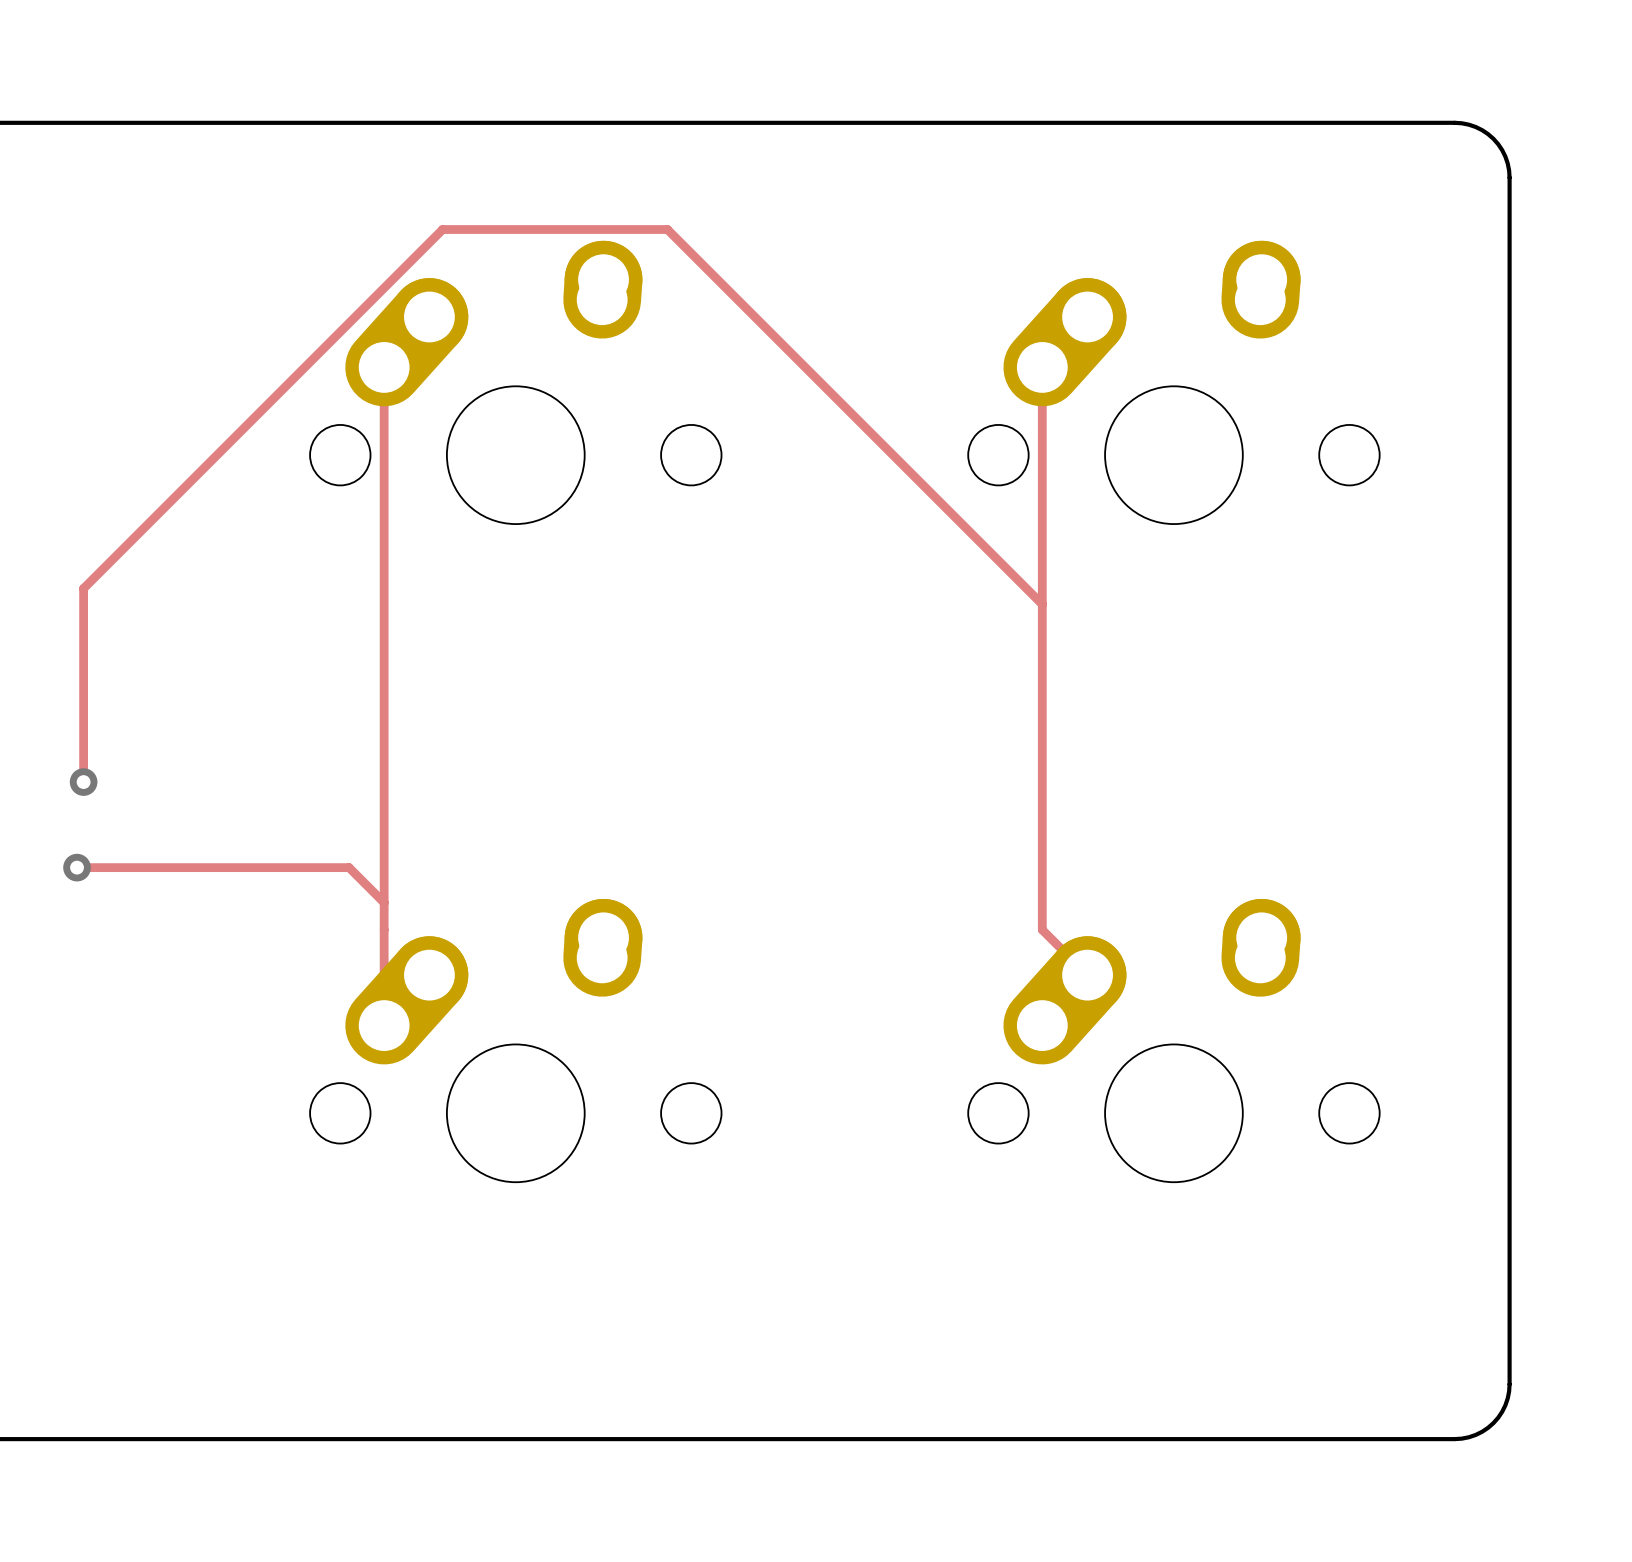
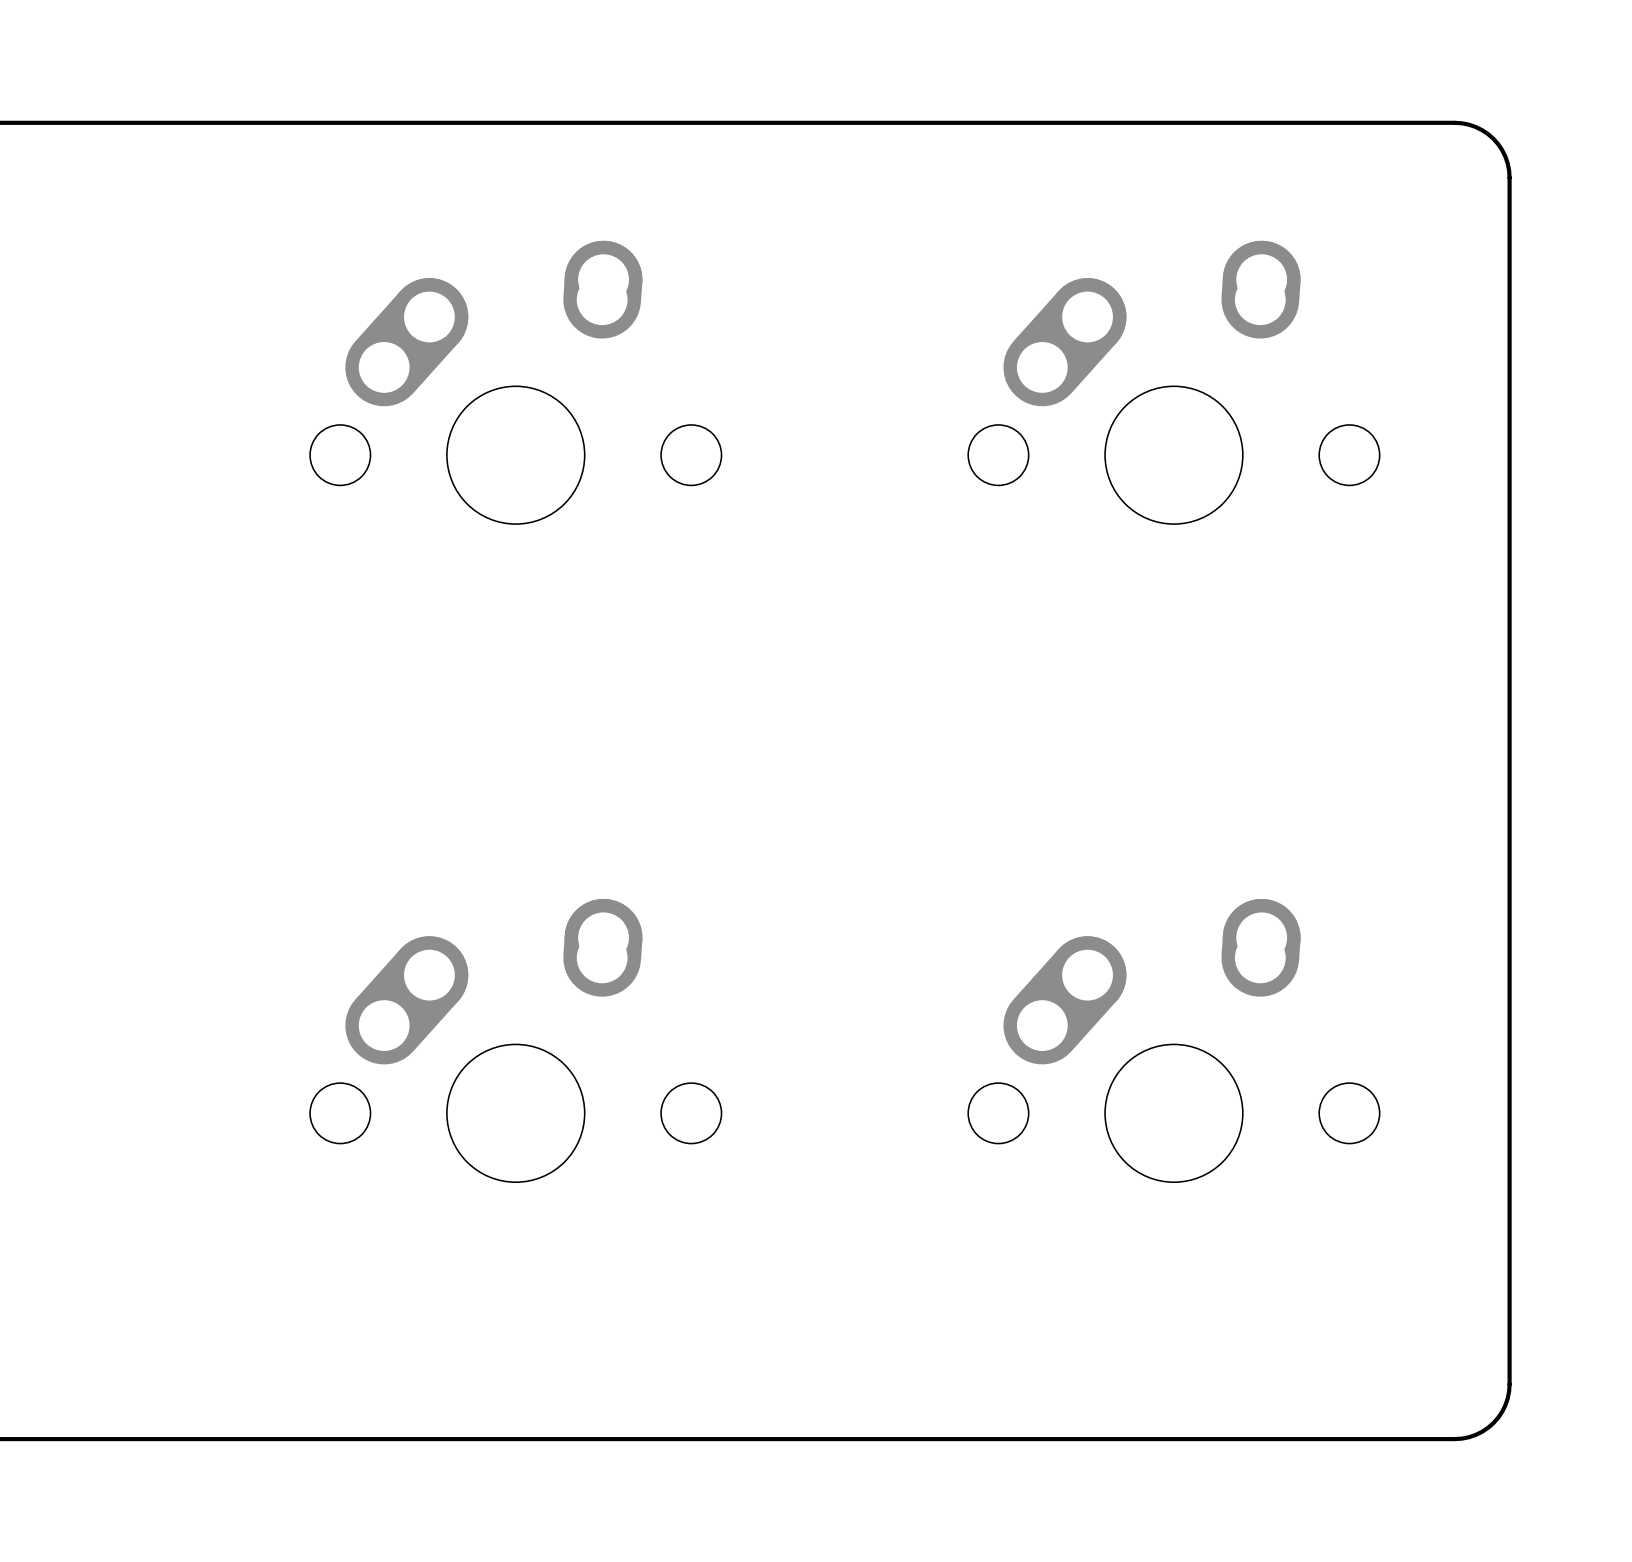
track: (384, 367) (384, 1025) -> none
track: (1042, 367) (1042, 929) (1087, 975) -> none
track: (1042, 604) (667, 229) (442, 229) (83, 588) (83, 782) -> none
via: (83, 782) -> none
track: (77, 867) (349, 867) (384, 902) -> none
via: (77, 867) -> none

